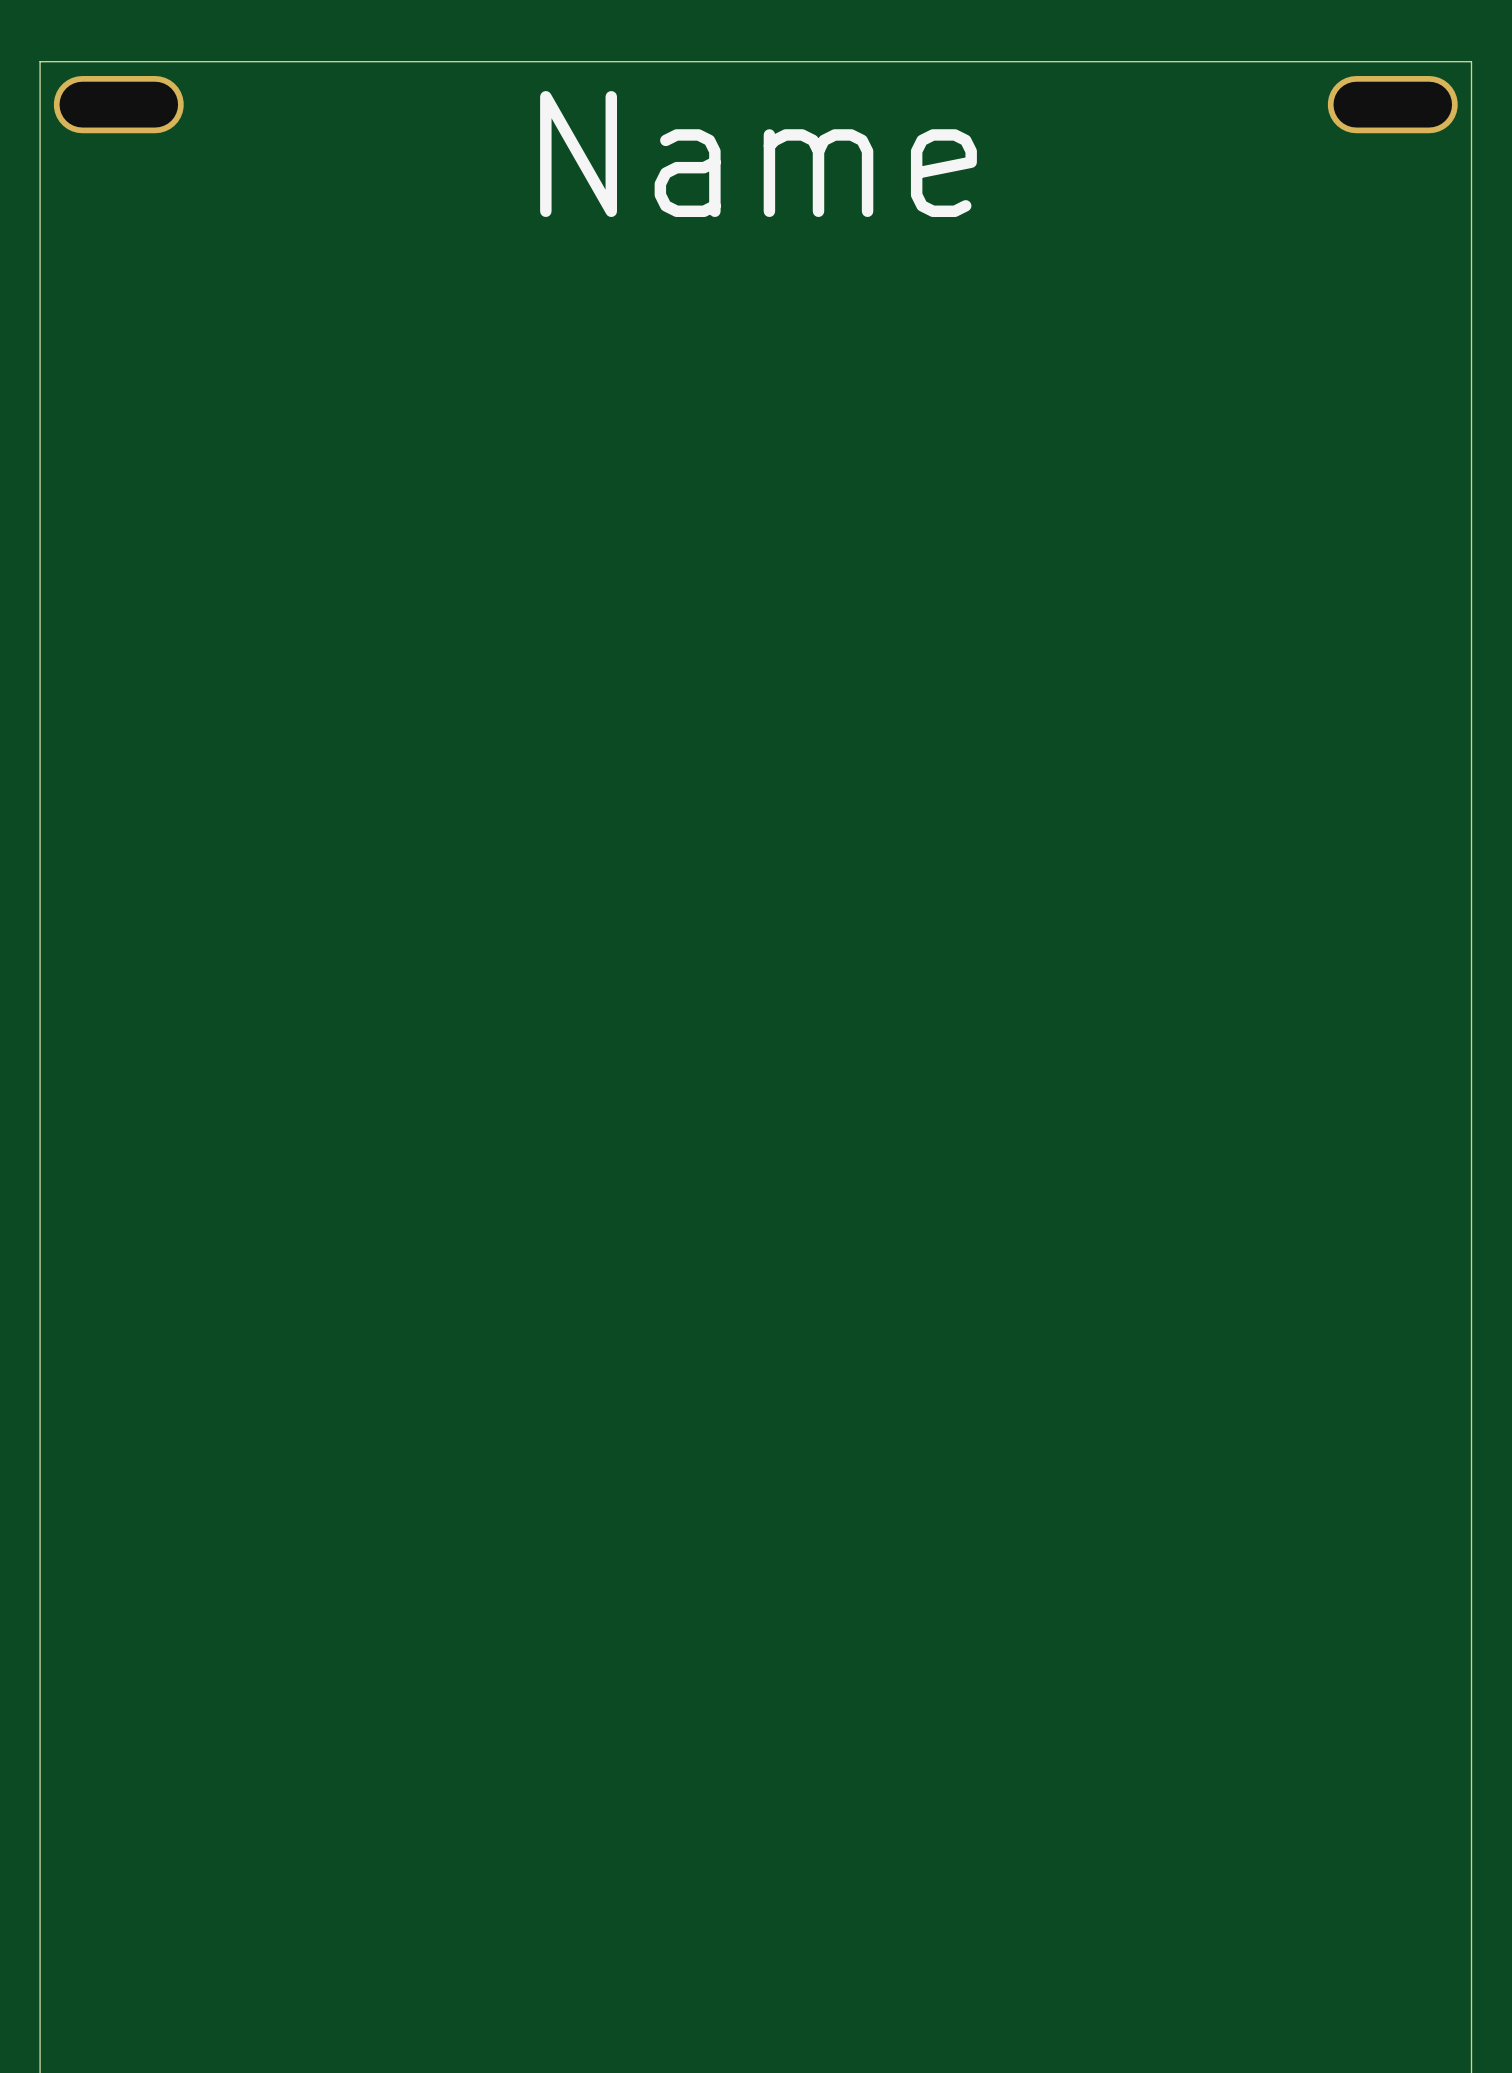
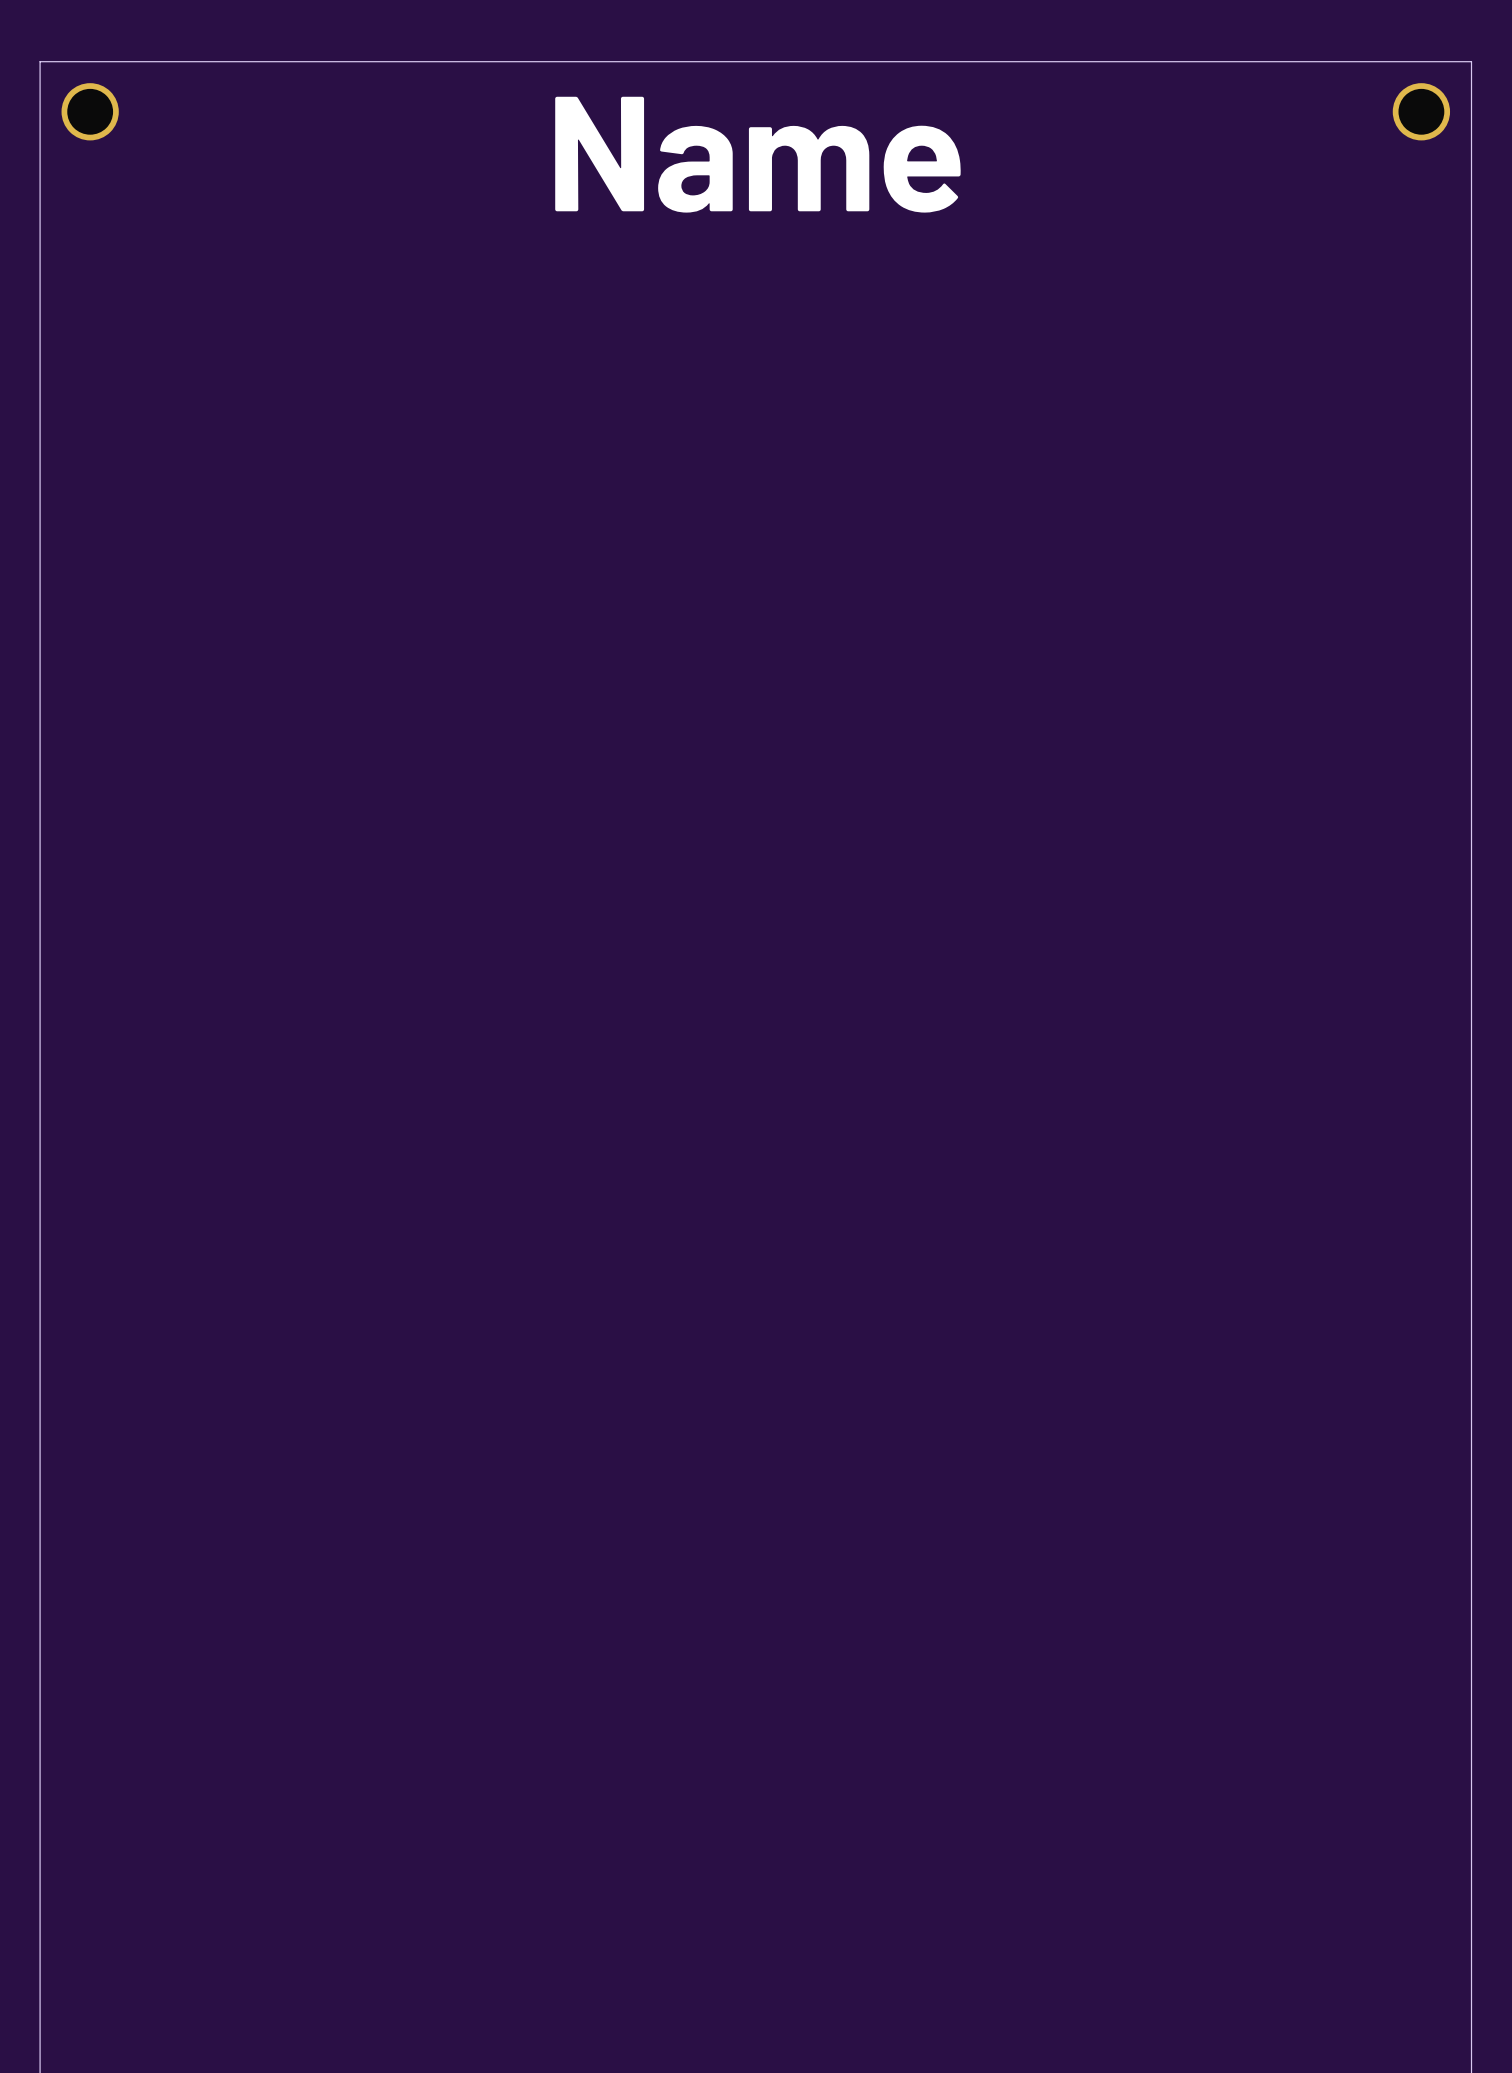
part: (118, 104) -> none
part: (1392, 104) -> none
part: none -> (90, 111)
part: none -> (1421, 111)

